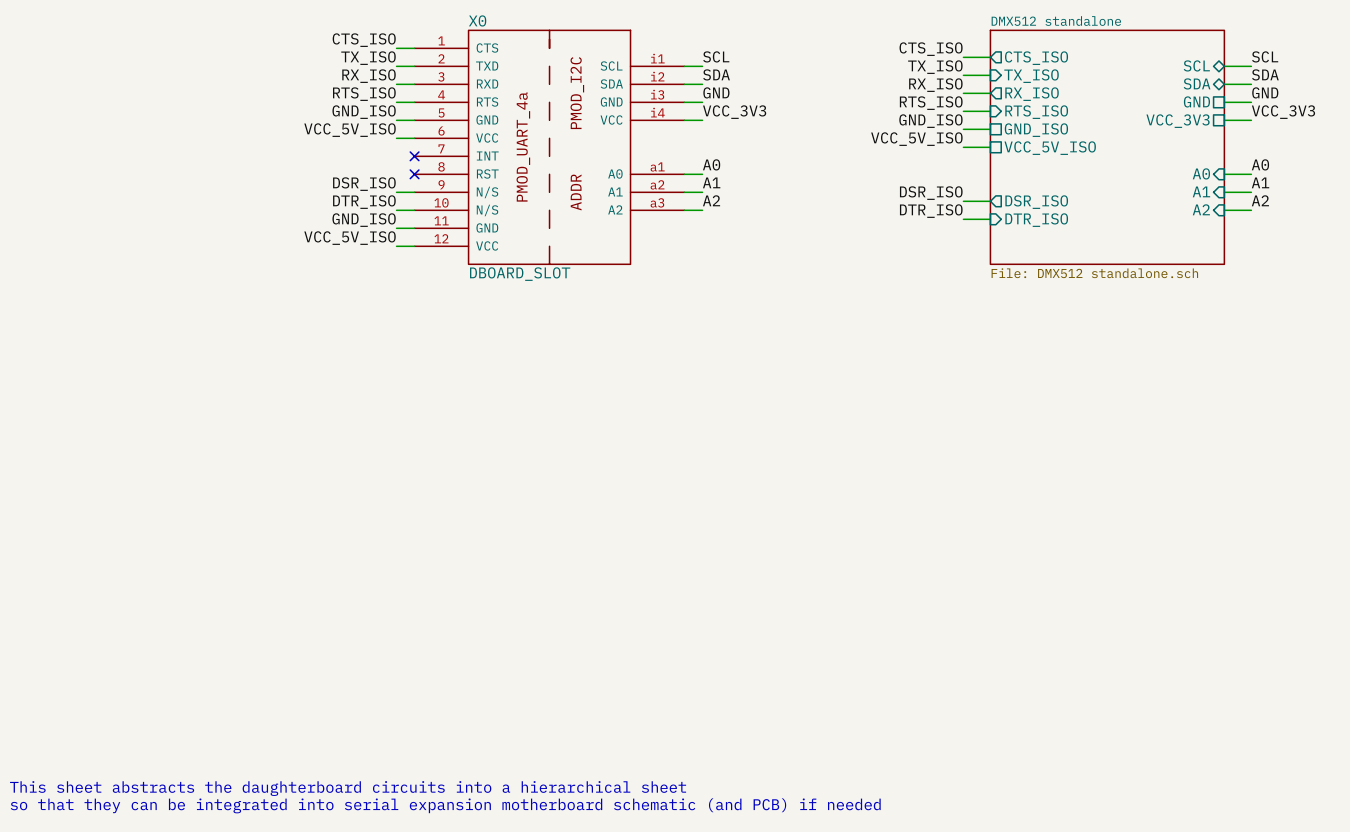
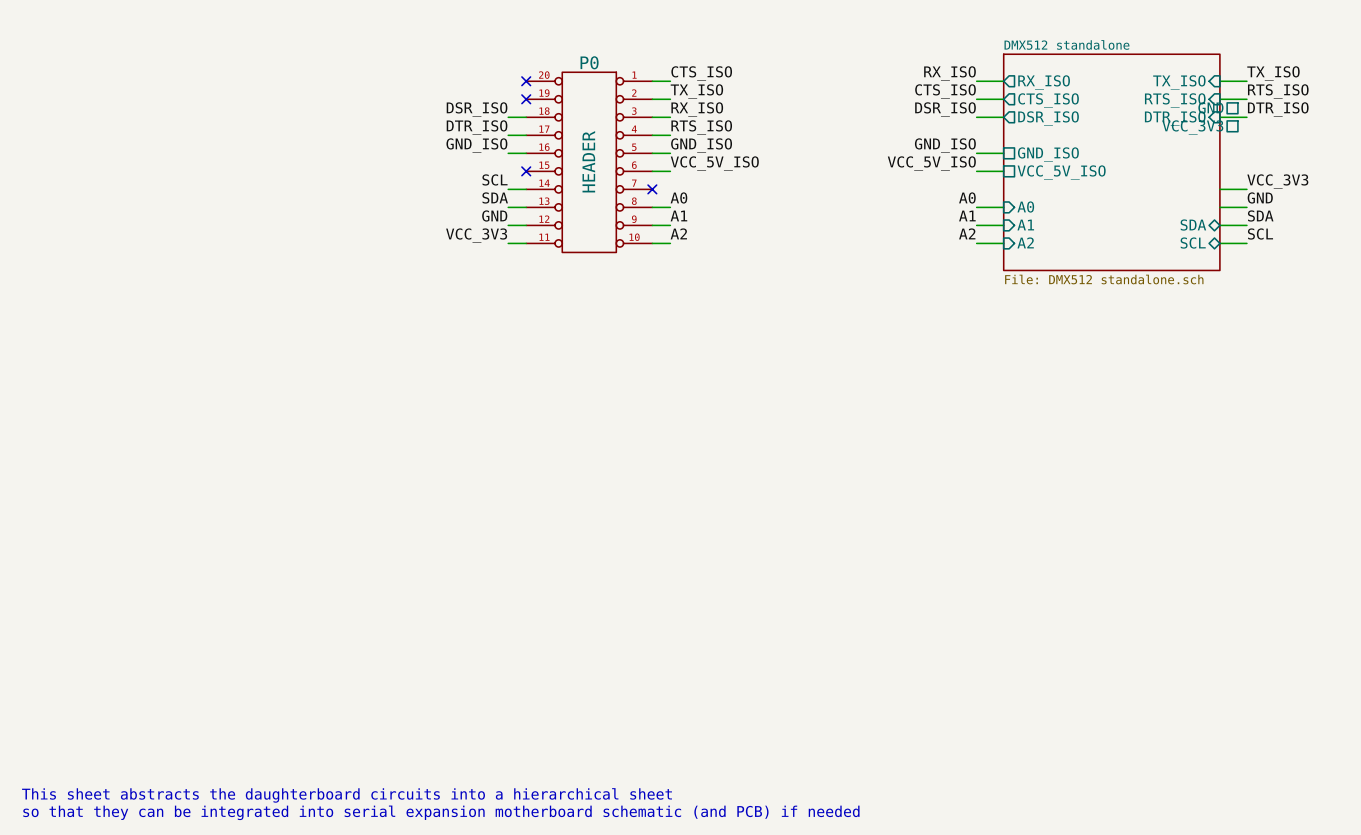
sheet DMX512 standalone shape: [990, 30, 1225, 265] -> [1003, 54, 1220, 271]
label: CTS_ISO (364, 40) -> none
wire: (396, 48) (414, 48) -> none
label: CTS_ISO (931, 49) -> none
label: SCL (716, 56) -> none
label position: SCL (1265, 56) -> SCL (1260, 234)
wire: (963, 57) (990, 57) -> (976, 171) (1003, 171)
label: TX_ISO (368, 58) -> none
sheet pin: CTS_ISO (1036, 58) -> none
sheet pin position: SCL (1196, 65) -> SCL (1193, 243)
wire: (396, 66) (414, 66) -> none
wire: (684, 66) (702, 66) -> (652, 99) (670, 99)
wire: (1224, 66) (1251, 66) -> (1219, 81) (1246, 81)
label: none -> CTS_ISO (701, 73)
label: TX_ISO (935, 67) -> RX_ISO (949, 73)
label: none -> TX_ISO (1273, 73)
label: SDA (716, 74) -> none
label position: SDA (1265, 74) -> SDA (1260, 215)
no-connect mark: none -> (526, 81)
wire: none -> (652, 81) (670, 81)
label: RX_ISO (368, 76) -> none
sheet pin shape: input (1031, 76) -> output (1044, 82)
sheet pin: TX_ISO (1031, 76) -> RX_ISO (1044, 82)
sheet pin: none -> TX_ISO (1179, 82)
sheet pin position: SDA (1197, 83) -> SDA (1193, 225)
wire: (396, 84) (414, 84) -> none
wire: (684, 84) (702, 84) -> (652, 117) (670, 117)
wire: (1224, 84) (1251, 84) -> (1219, 99) (1246, 99)
label: none -> TX_ISO (696, 91)
label: RX_ISO (935, 85) -> CTS_ISO (945, 91)
label: none -> RTS_ISO (1278, 91)
label: GND (716, 92) -> none
label position: GND (1265, 92) -> GND (1260, 197)
no-connect mark: none -> (526, 99)
label: RTS_ISO (364, 94) -> none
sheet pin: RX_ISO (1032, 94) -> CTS_ISO (1048, 100)
sheet pin: none -> RTS_ISO (1175, 100)
wire: (396, 102) (414, 102) -> (508, 117) (526, 117)
wire: (684, 102) (702, 102) -> (652, 135) (670, 135)
wire: (1224, 102) (1251, 102) -> (1219, 117) (1246, 117)
label: none -> RX_ISO (697, 109)
label: RTS_ISO (931, 103) -> DSR_ISO (945, 109)
label: none -> DTR_ISO (1278, 109)
label: GND_ISO (364, 112) -> none
label: VCC_3V3 (734, 112) -> none
sheet pin shape: input (1036, 112) -> output (1048, 118)
sheet pin: RTS_ISO (1036, 112) -> DSR_ISO (1048, 118)
sheet pin: none -> DTR_ISO (1175, 118)
label position: VCC_3V3 (1283, 112) -> VCC_3V3 (1277, 181)
wire: (396, 120) (414, 120) -> (508, 135) (526, 135)
wire: (684, 120) (702, 120) -> (652, 153) (670, 153)
wire: (1224, 120) (1251, 120) -> (1219, 243) (1246, 243)
label: none -> RTS_ISO (701, 127)
label: GND_ISO (930, 121) -> none
wire: (963, 129) (990, 129) -> (976, 243) (1003, 243)
label: VCC_5V_ISO (350, 130) -> none
sheet pin: GND_ISO (1036, 130) -> none
wire: (396, 138) (414, 138) -> (508, 153) (526, 153)
label: none -> GND_ISO (476, 145)
label: none -> GND_ISO (701, 145)
label: VCC_5V_ISO (916, 139) -> GND_ISO (945, 145)
X0: DBOARD_SLOT (549, 147) -> none
sheet pin: VCC_5V_ISO (1050, 148) -> GND_ISO (1048, 154)
no-connect mark: (414, 156) -> none
P0: none -> HEADER (589, 162)
label: none -> VCC_5V_ISO (714, 163)
label: none -> VCC_5V_ISO (931, 163)
label position: A0 (711, 164) -> A0 (678, 197)
label: A0 (1260, 164) -> none
no-connect mark: none -> (526, 171)
wire: none -> (652, 171) (670, 171)
sheet pin: none -> VCC_5V_ISO (1061, 172)
label: none -> SCL (494, 179)
sheet pin: A0 (1201, 173) -> none
no-connect mark: (414, 174) -> none
wire: (684, 174) (702, 174) -> (652, 207) (670, 207)
wire: (1224, 174) (1251, 174) -> (1219, 189) (1246, 189)
label position: A1 (711, 182) -> A1 (678, 215)
label: A1 (1260, 182) -> none
no-connect mark: none -> (652, 189)
label position: DSR_ISO (364, 184) -> DSR_ISO (477, 109)
label: none -> SDA (495, 197)
sheet pin: A1 (1201, 191) -> none
wire: (396, 192) (414, 192) -> (508, 189) (526, 189)
wire: (684, 192) (702, 192) -> (652, 225) (670, 225)
wire: (1224, 192) (1251, 192) -> (1219, 207) (1246, 207)
label: DSR_ISO (931, 193) -> A0 (967, 197)
label position: A2 (711, 200) -> A2 (678, 233)
label: A2 (1260, 200) -> none
label position: DTR_ISO (364, 202) -> DTR_ISO (477, 127)
sheet pin shape: output (1036, 202) -> input (1025, 207)
sheet pin: DSR_ISO (1036, 202) -> A0 (1025, 207)
label: none -> GND (494, 215)
sheet pin: A2 (1201, 209) -> none
wire: (396, 210) (414, 210) -> (508, 207) (526, 207)
wire: (684, 210) (702, 210) -> (652, 243) (670, 243)
wire: (1224, 210) (1251, 210) -> (1219, 225) (1246, 225)
label: DTR_ISO (931, 211) -> A1 (967, 215)
label: GND_ISO (364, 220) -> none
sheet pin: DTR_ISO (1036, 220) -> A1 (1025, 225)
label: none -> A2 (967, 233)
wire: (396, 228) (414, 228) -> (508, 225) (526, 225)
label: none -> VCC_3V3 (476, 235)
sheet pin: none -> A2 (1025, 242)
label: VCC_5V_ISO (350, 238) -> none
wire: (396, 246) (414, 246) -> (508, 243) (526, 243)

